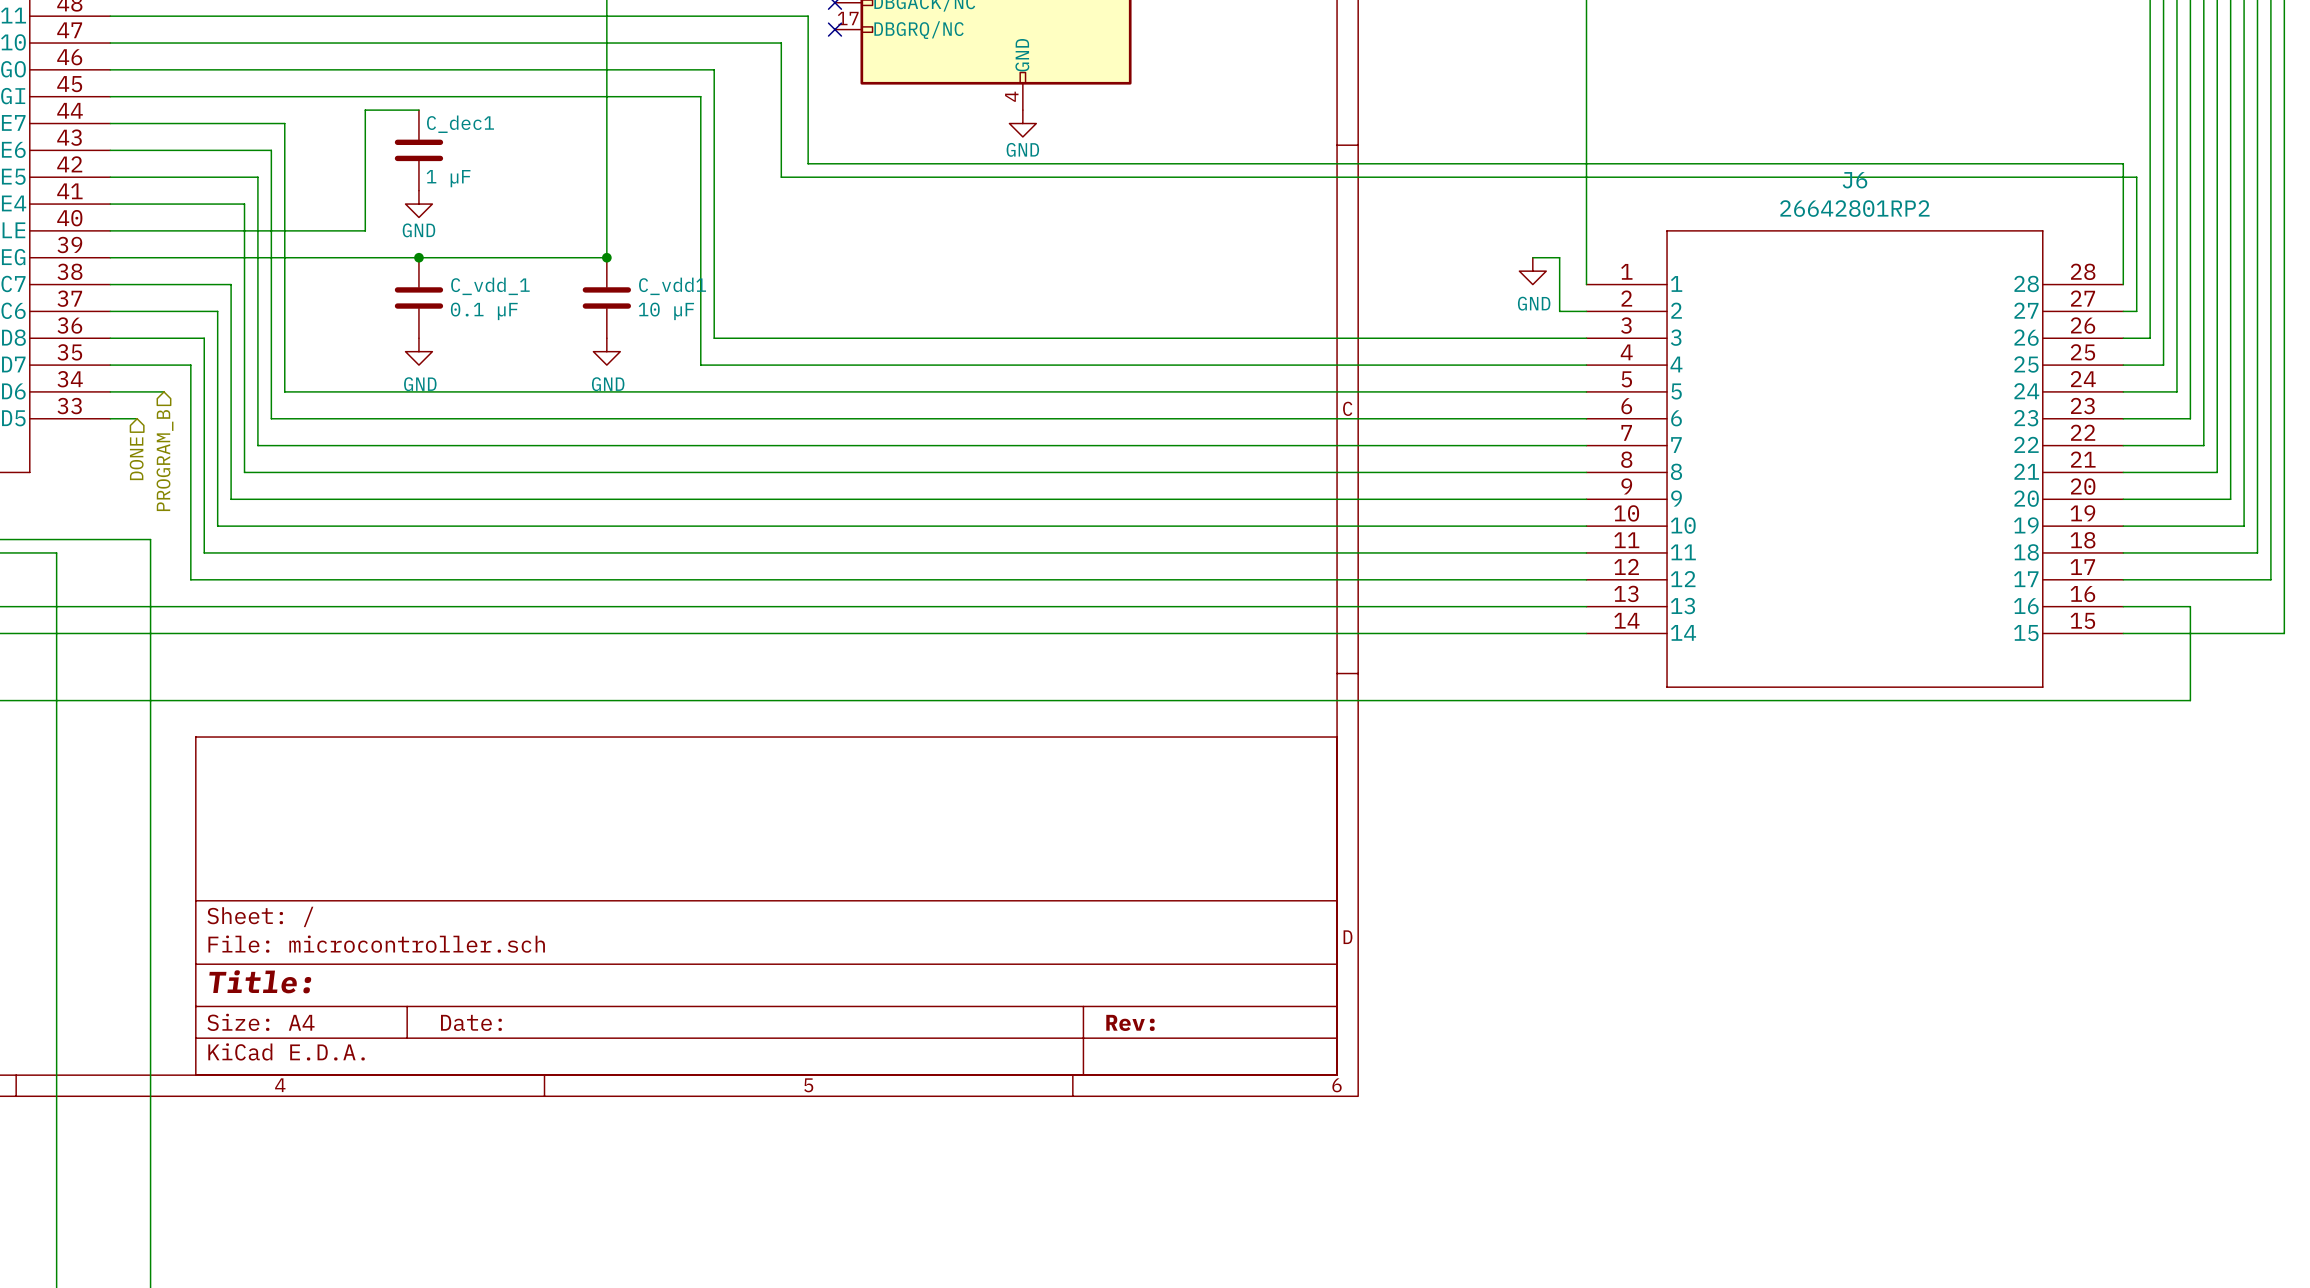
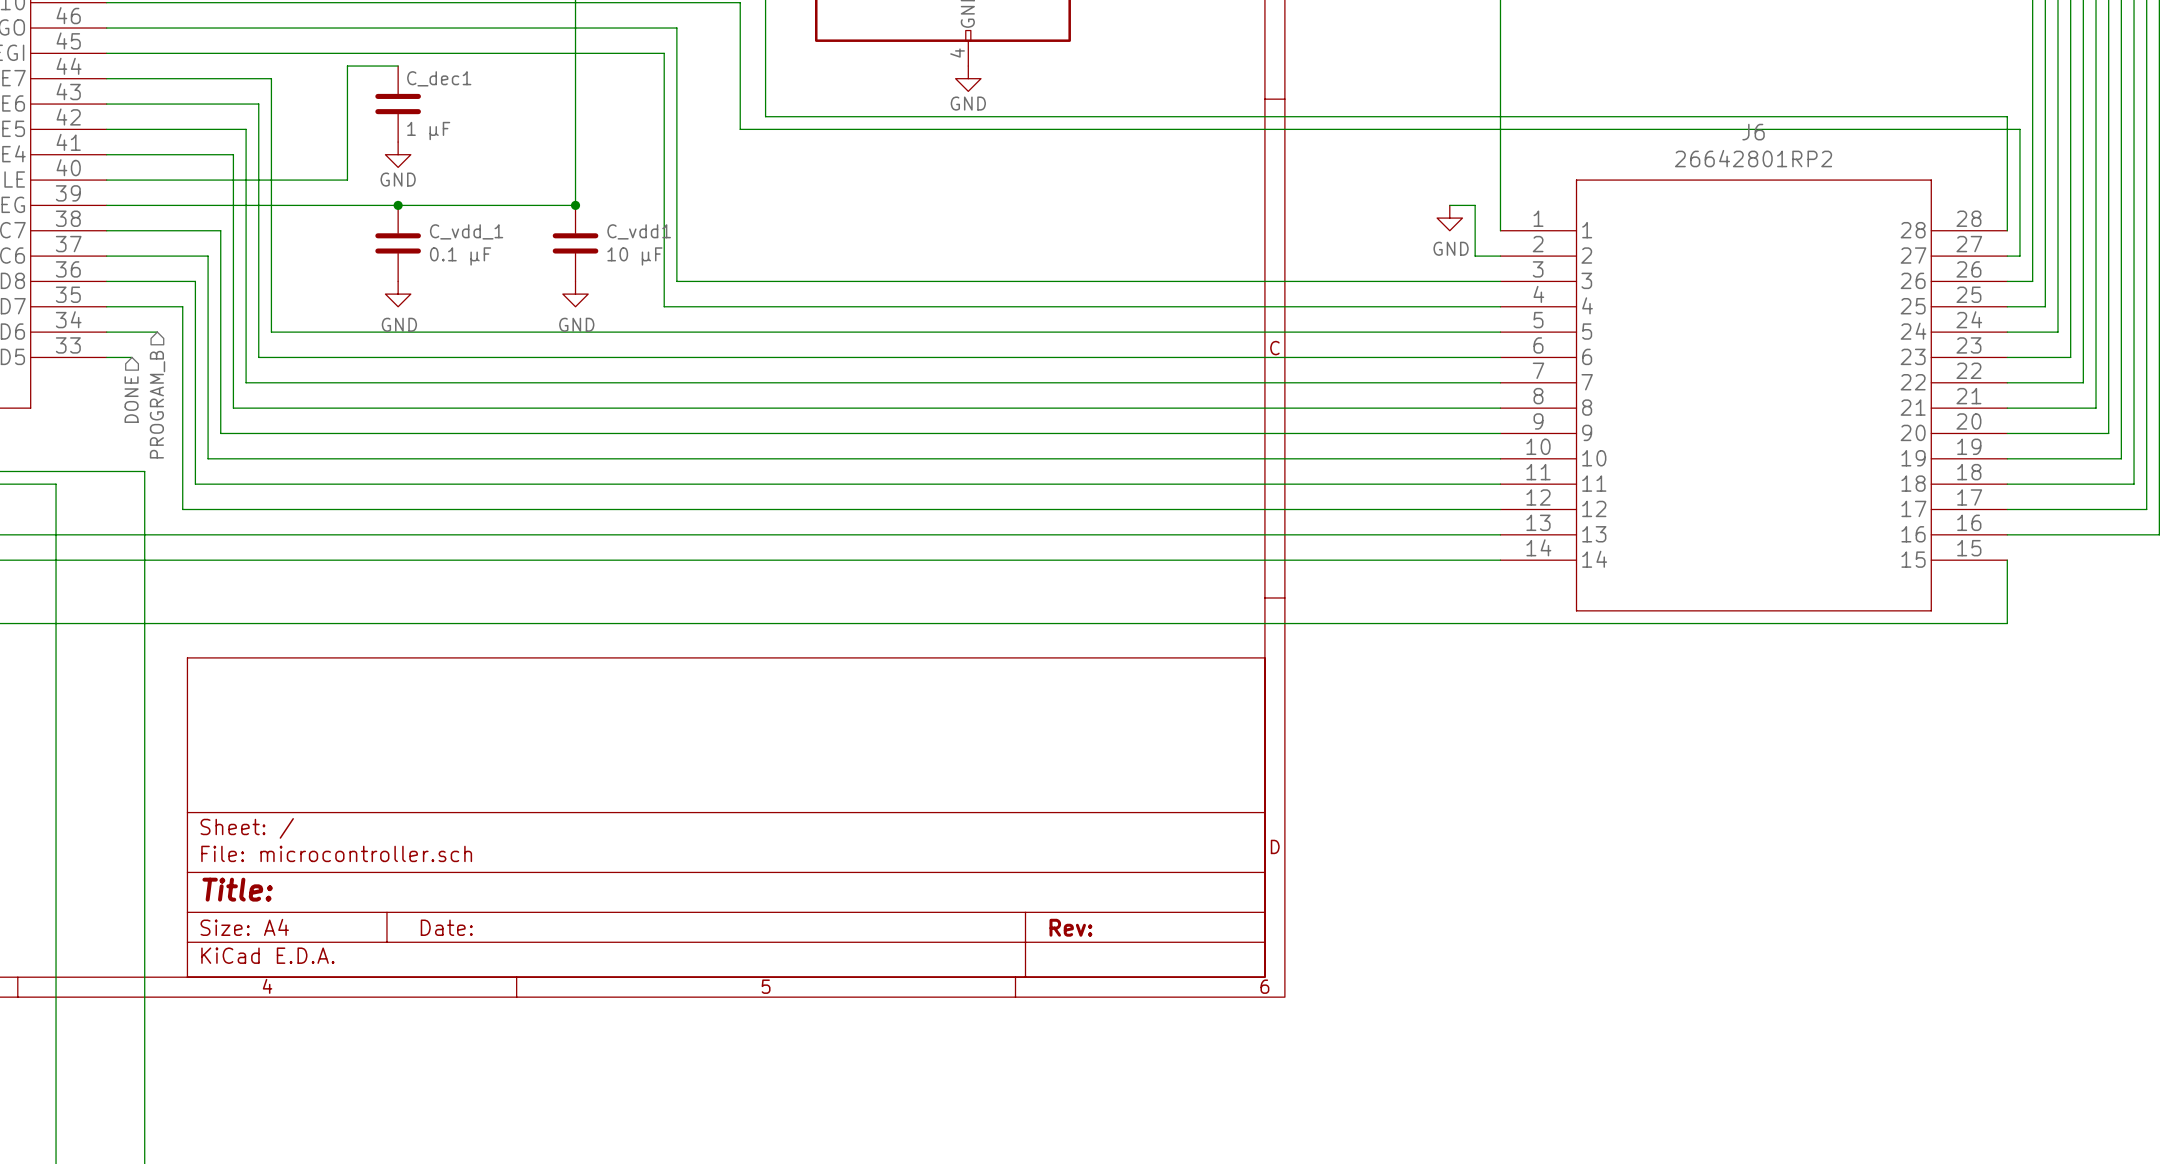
wire: (2190, 606) (2190, 700) (2123, 700) -> (2007, 560) (2007, 623)
wire: (2284, 606) (2284, 633) (2123, 633) -> (2159, 534) (2070, 534)

